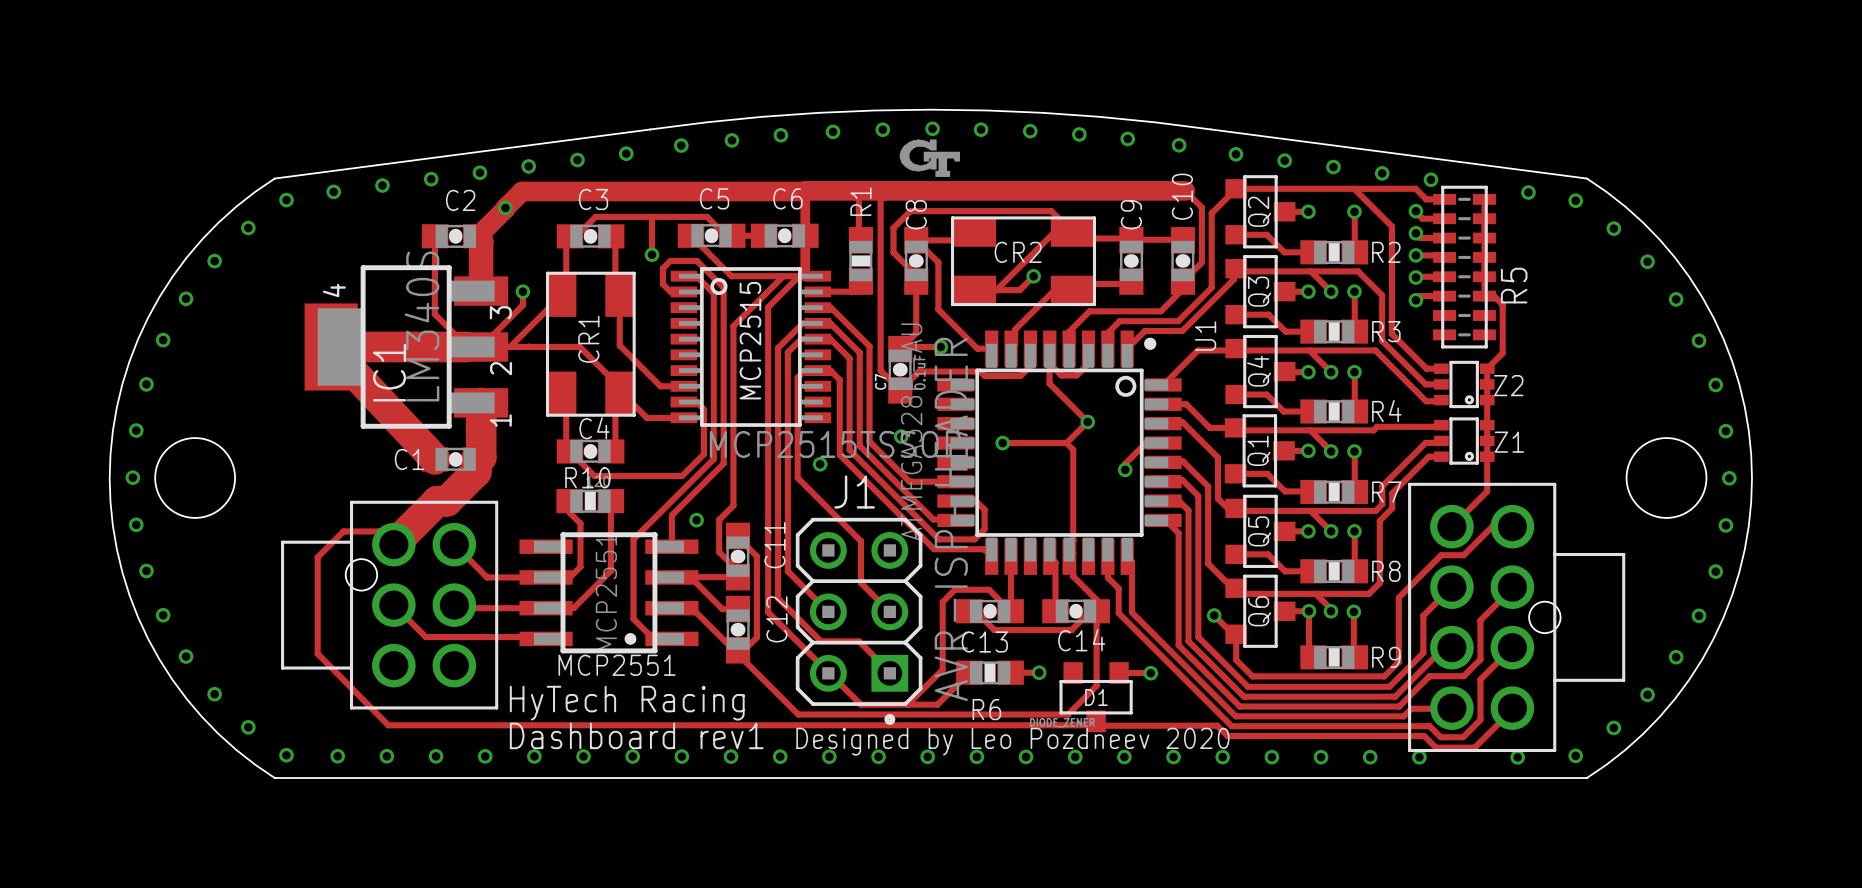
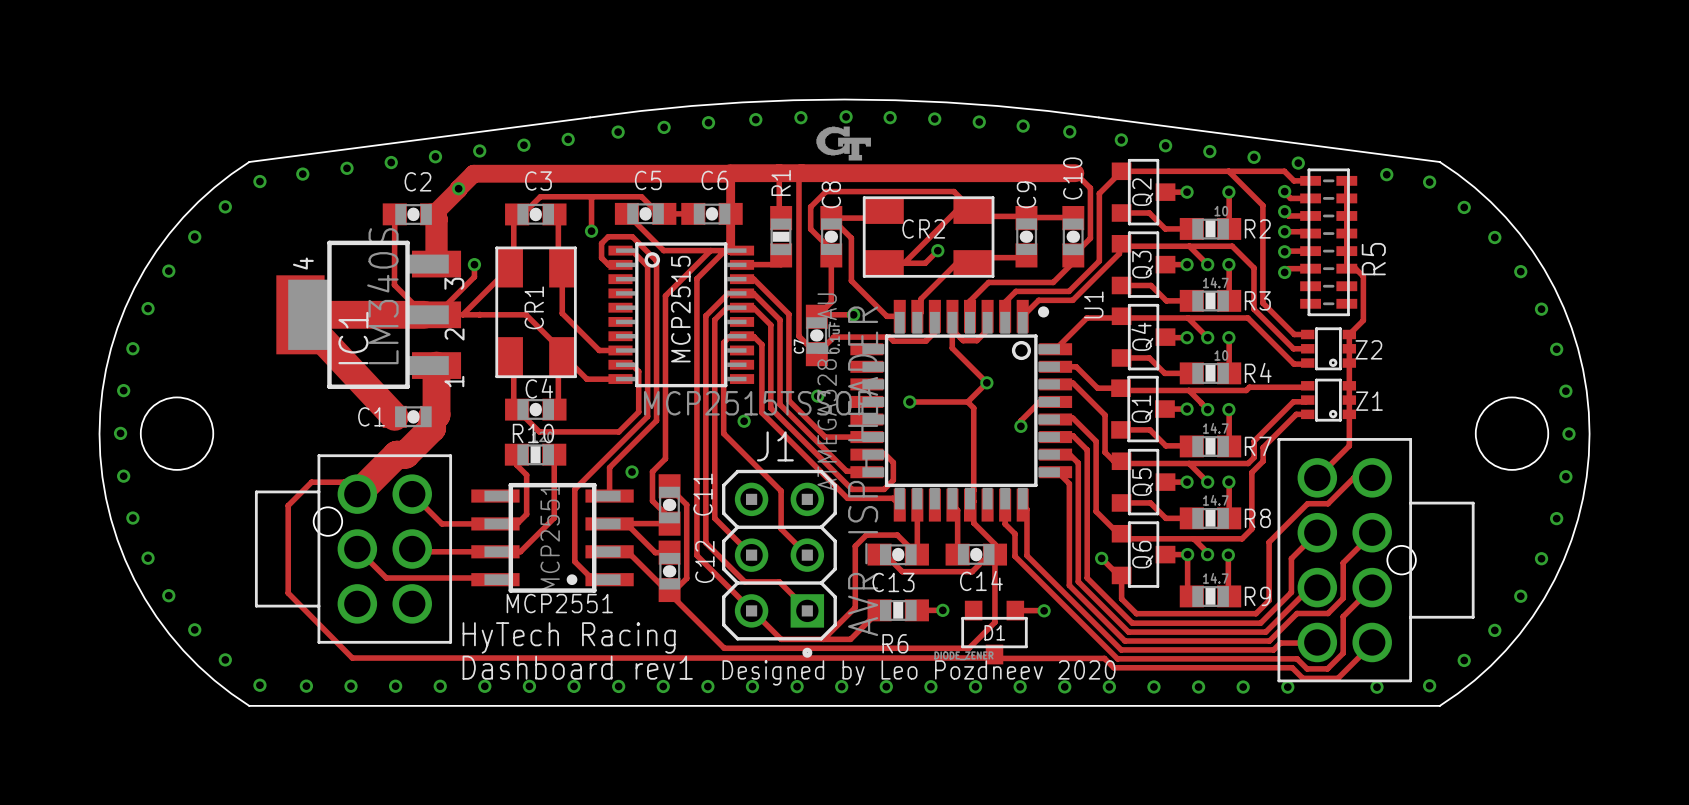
R2 value: none -> 10 (1221, 211)
R3 value: none -> 14.7 (1215, 282)
R4 value: none -> 10 (1221, 355)
R7 value: none -> 14.7 (1215, 428)
R8 value: none -> 14.7 (1215, 500)
R9 value: none -> 14.7 (1215, 578)

